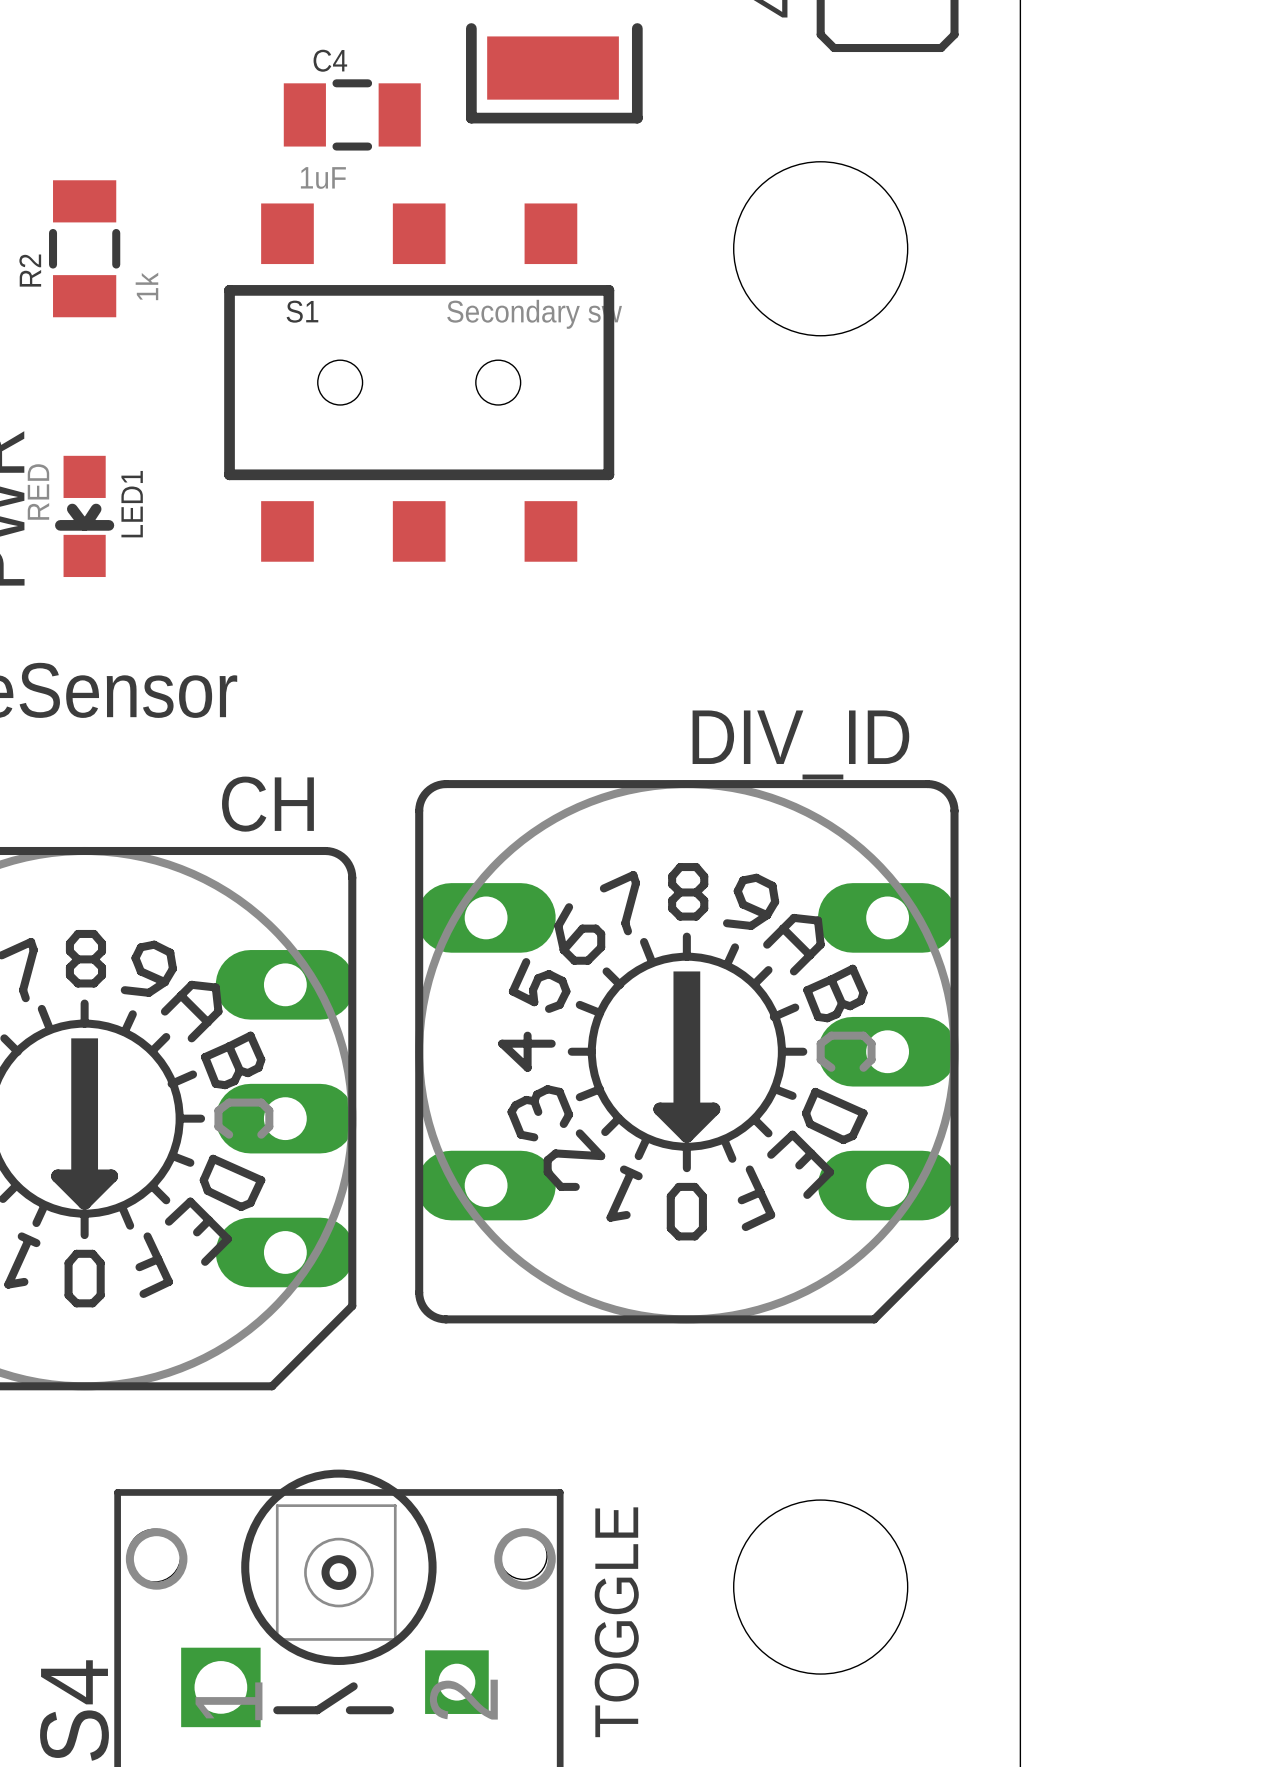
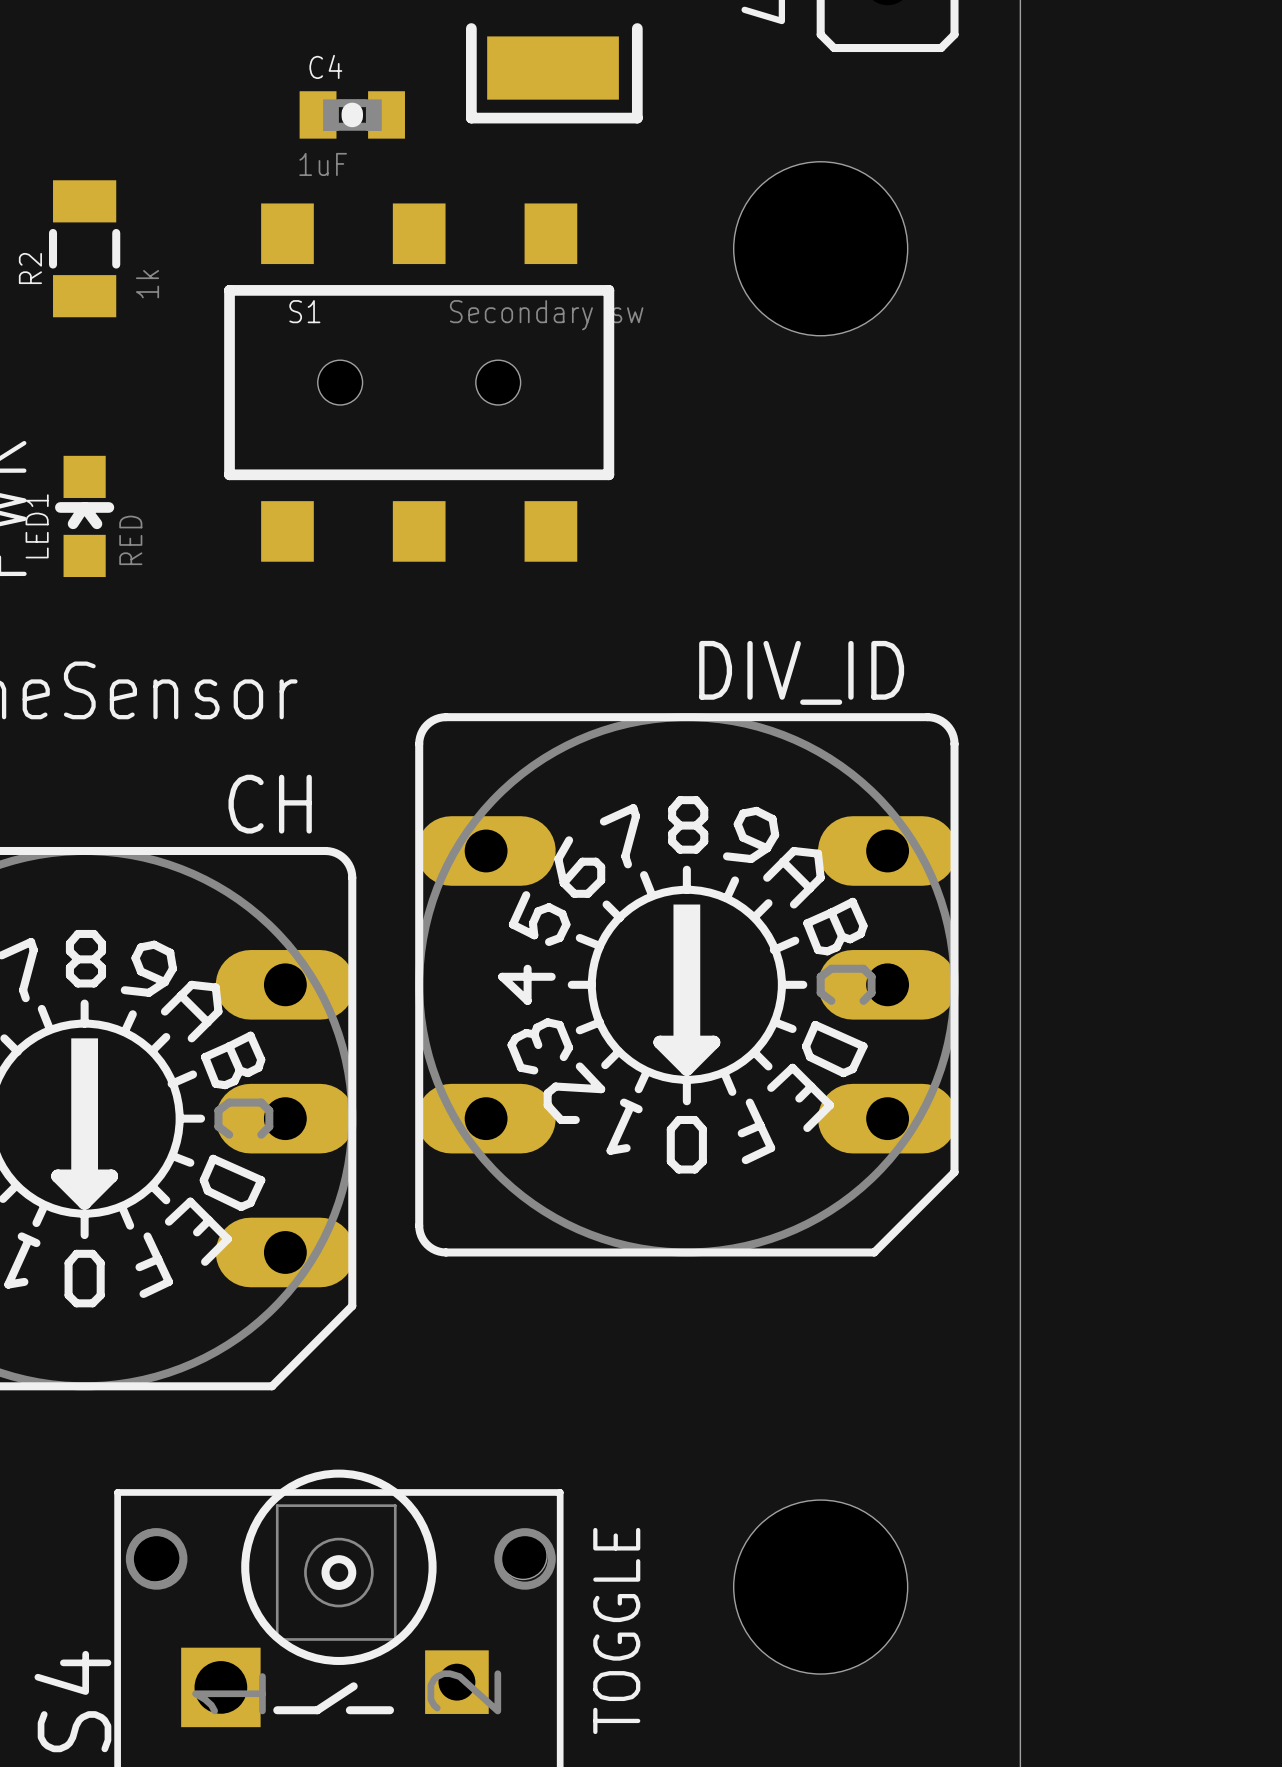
C4 footprint: [283, 79, 421, 151] -> [299, 91, 405, 139]
LED1 rotation: 0° (84, 516) -> 180° (84, 516)
DIV_ID position: (686, 1051) -> (686, 984)

